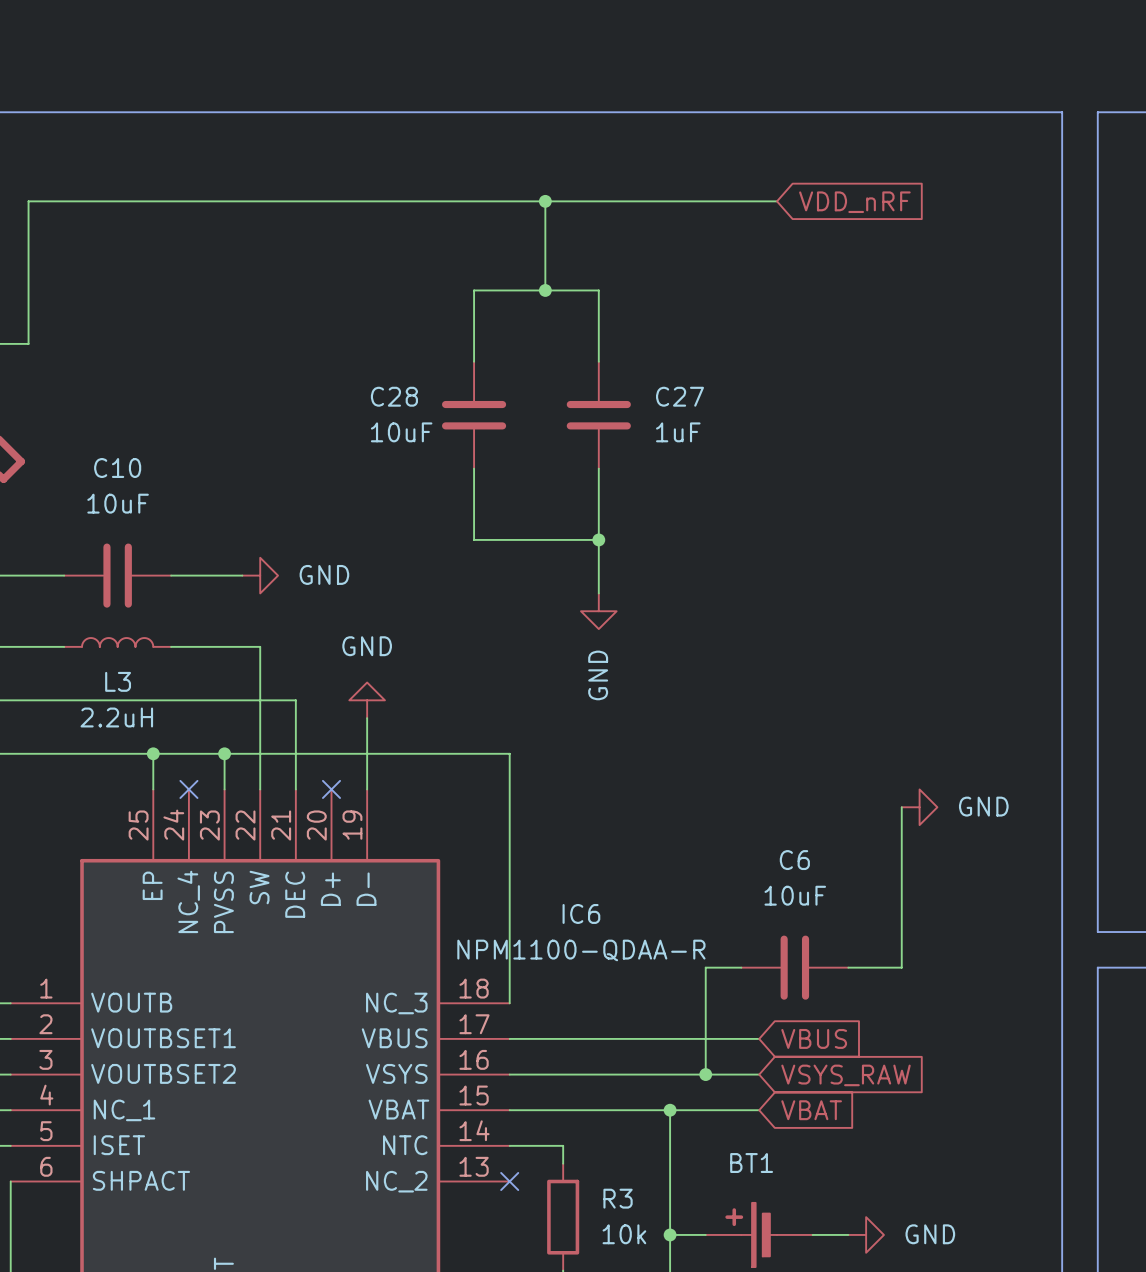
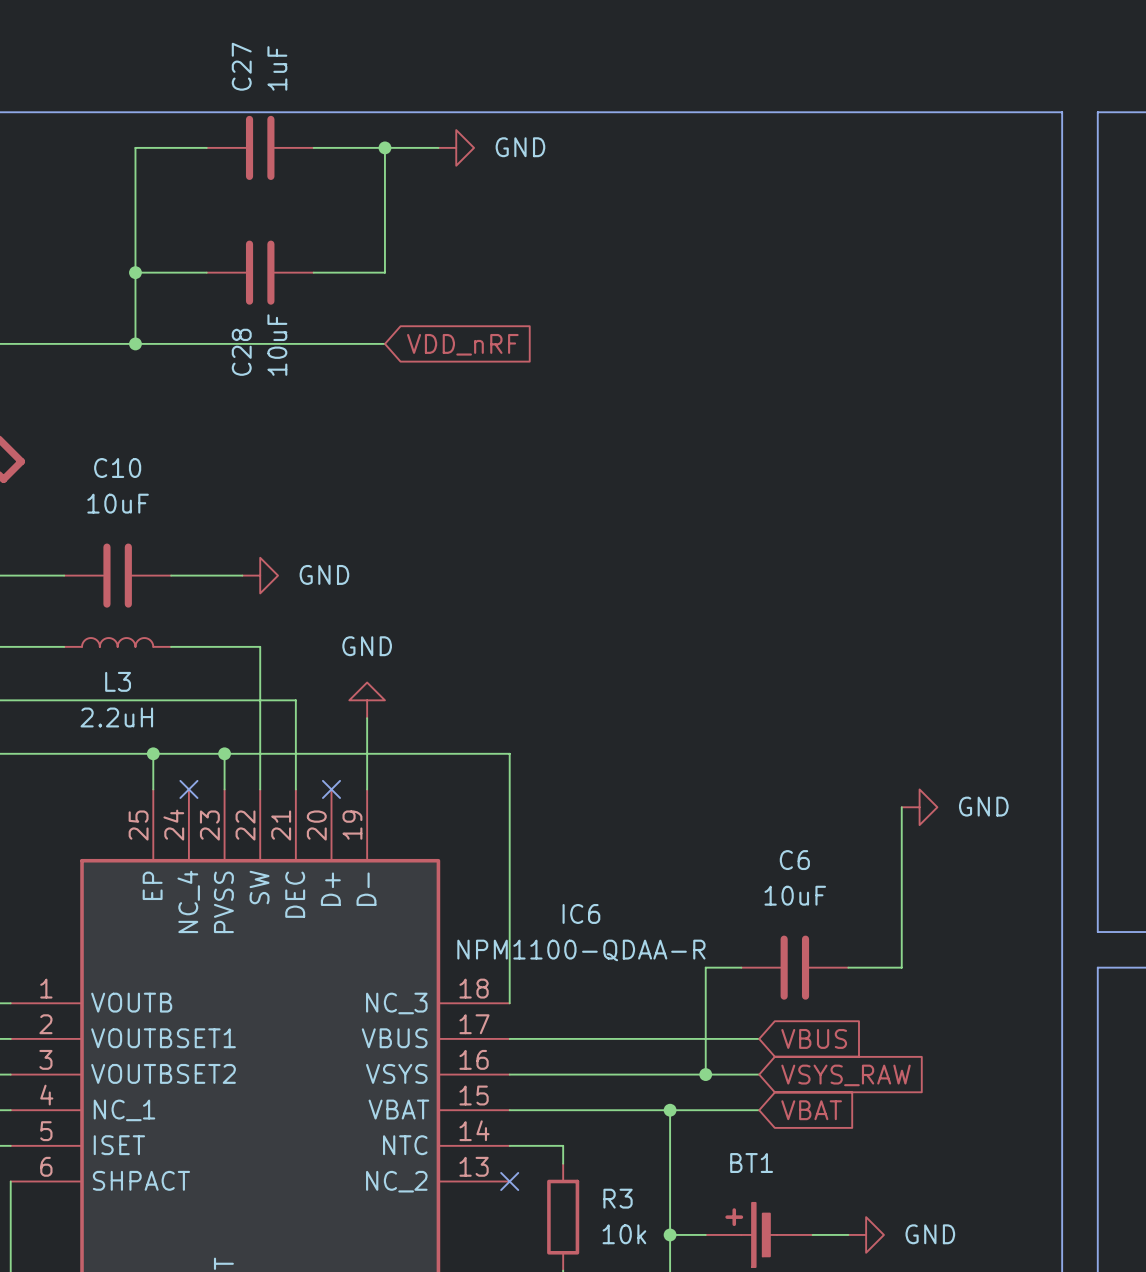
wire: none -> (206, 147) (135, 147) (135, 343)
wire: none -> (313, 147) (438, 147)
wire: none -> (384, 147) (384, 272) (313, 272)
junction: none -> (384, 147)
power symbol: none -> GND (456, 147)
wire: (545, 201) (545, 290) -> none
junction: (545, 201) -> none
wire: (777, 201) (28, 201) (28, 343) -> (384, 343) (28, 343)
global label: VDD_nRF (854, 202) -> none
wire: none -> (135, 272) (206, 272)
junction: none -> (135, 272)
junction: (545, 290) -> none
junction: none -> (135, 343)
global label: none -> VDD_nRF (462, 344)
wire: (474, 361) (474, 290) (598, 290) (598, 361) -> none
C28 name position: C28 (394, 396) -> C28 (241, 352)
C27 name position: C27 (679, 396) -> C27 (241, 66)
C28 rotation: 0° (474, 415) -> 90° clockwise (260, 272)
C28 position: (474, 415) -> (260, 272)
C27 rotation: 0° (598, 415) -> 90° clockwise (260, 147)
C27 position: (598, 415) -> (260, 147)
C28 value position: 10uF (401, 432) -> 10uF (277, 345)
C27 value position: 1uF (678, 432) -> 1uF (277, 68)
wire: (474, 468) (474, 539) (598, 539) -> none
wire: (598, 468) (598, 593) -> none
junction: (598, 539) -> none
power symbol: GND (598, 611) -> none

